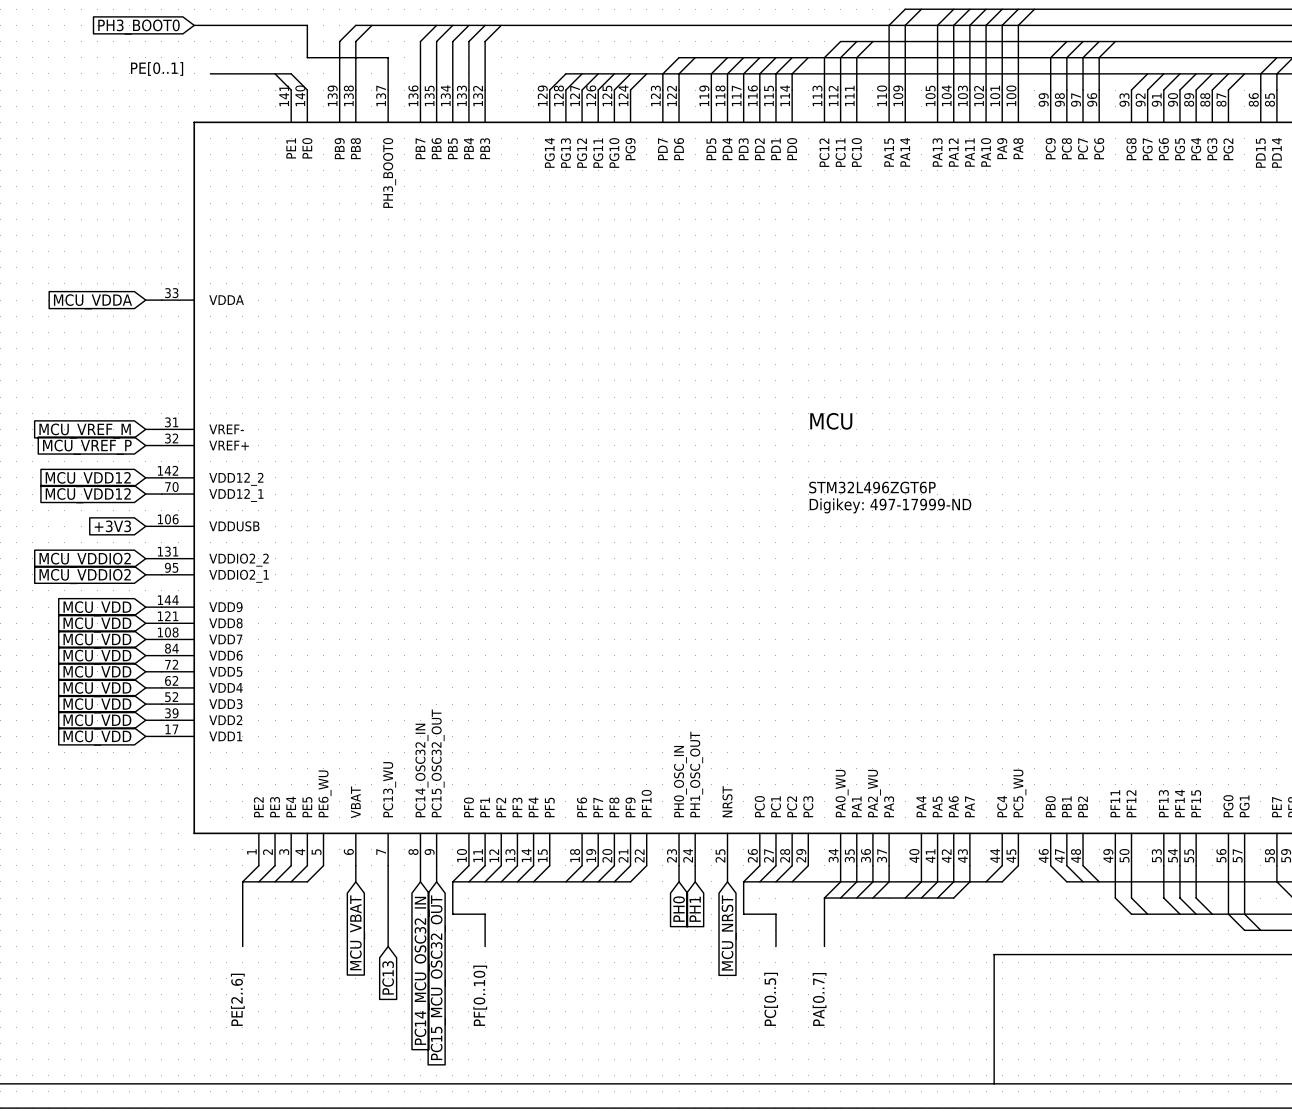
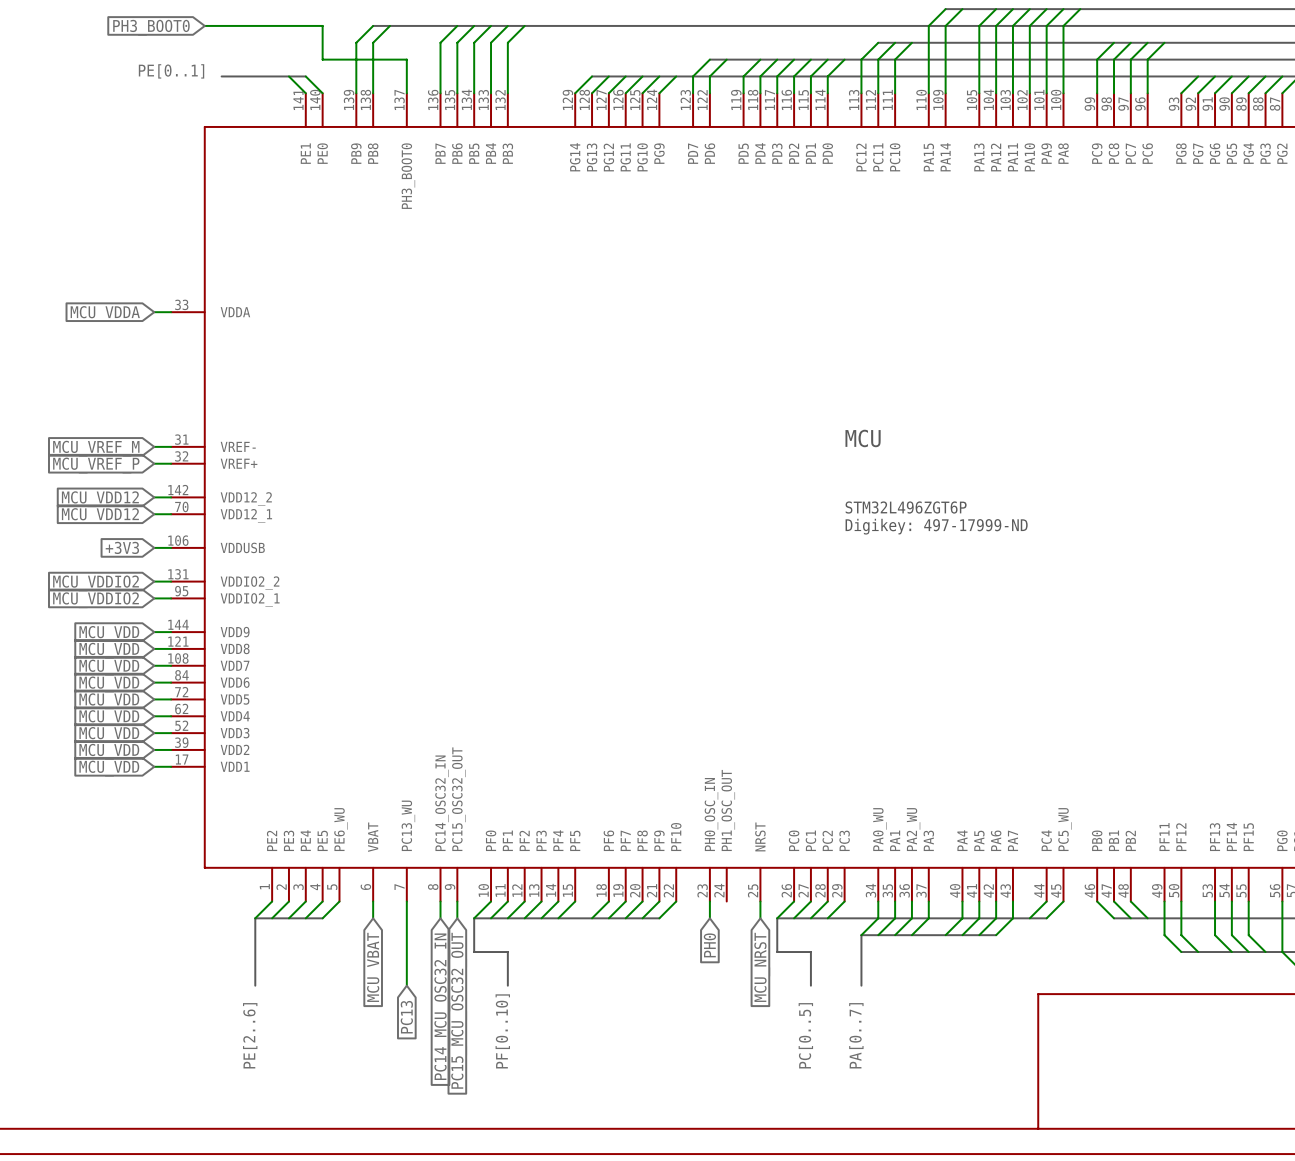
wire: (695, 865) (695, 881) -> none
global label: PH1 (695, 909) -> none

